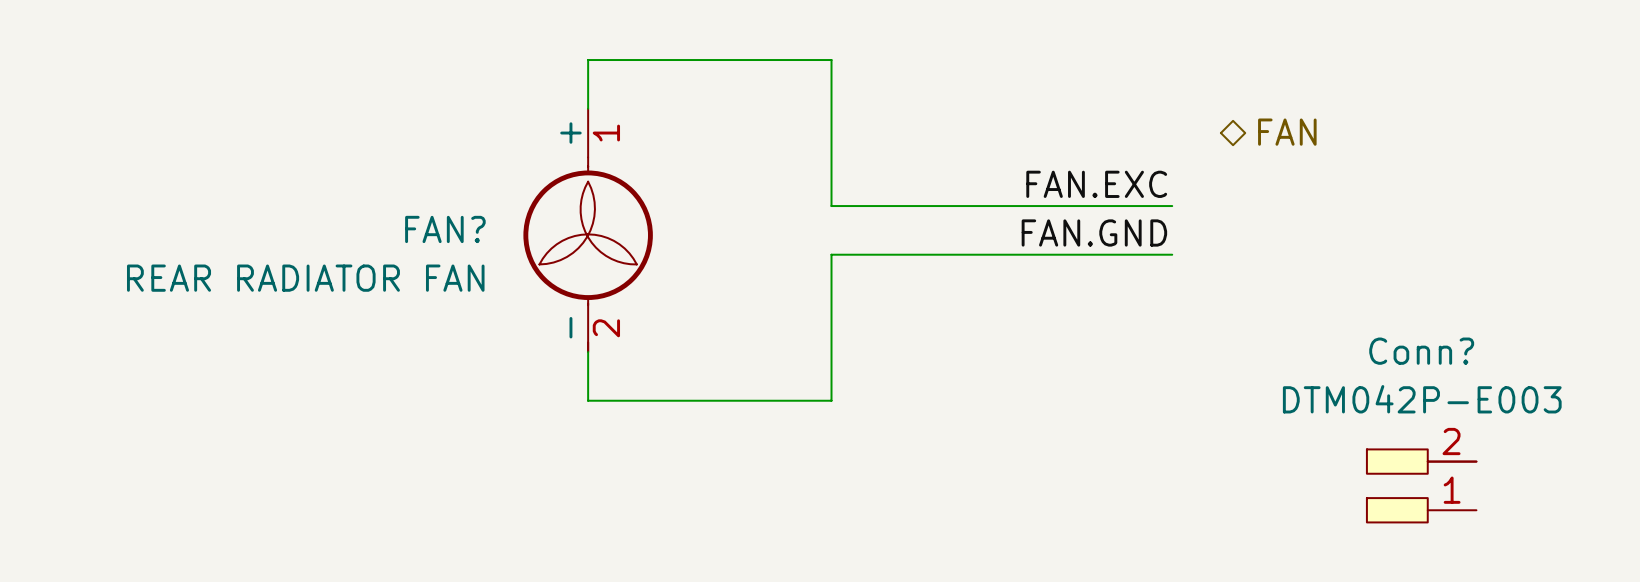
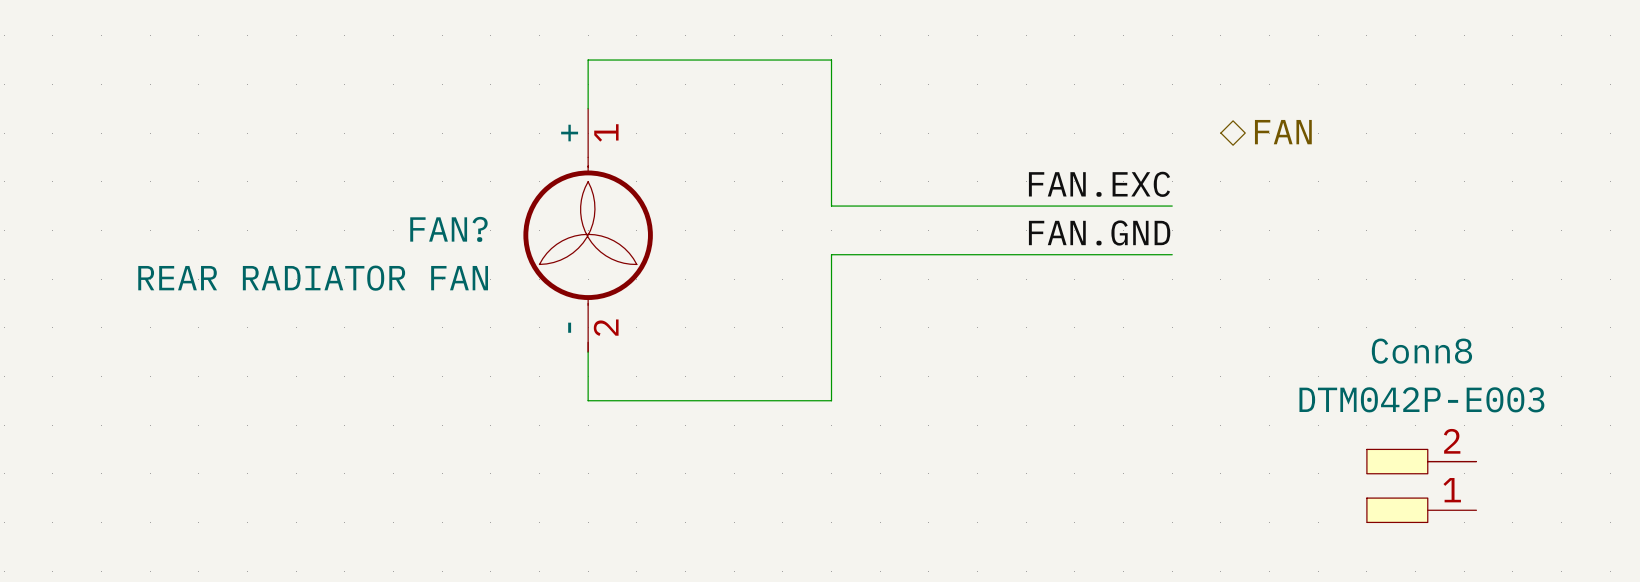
Conn? name: Conn? (1421, 351) -> Conn8 (1421, 351)

